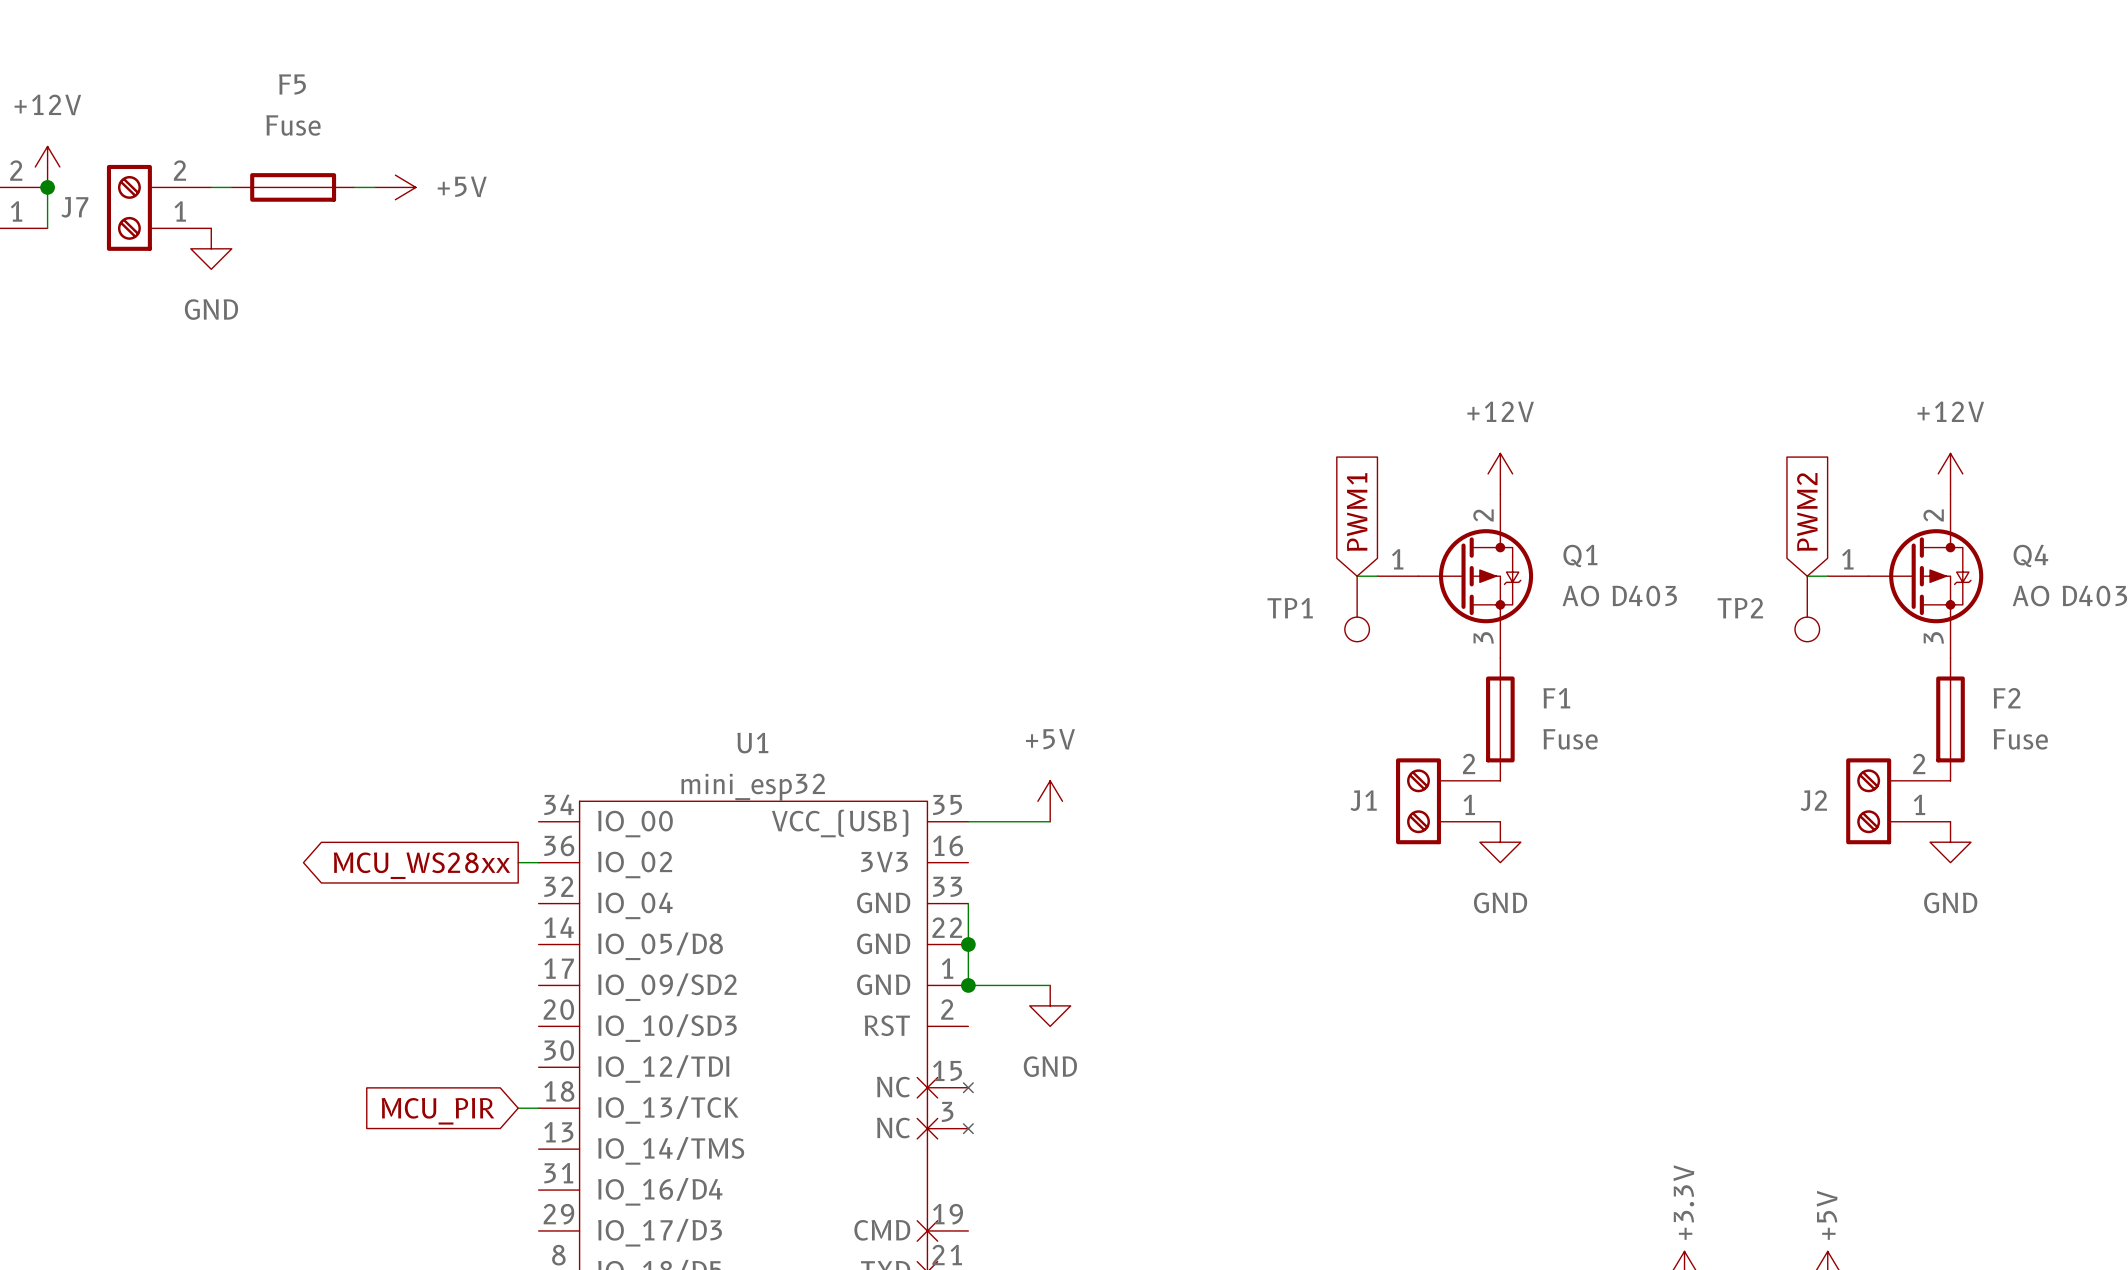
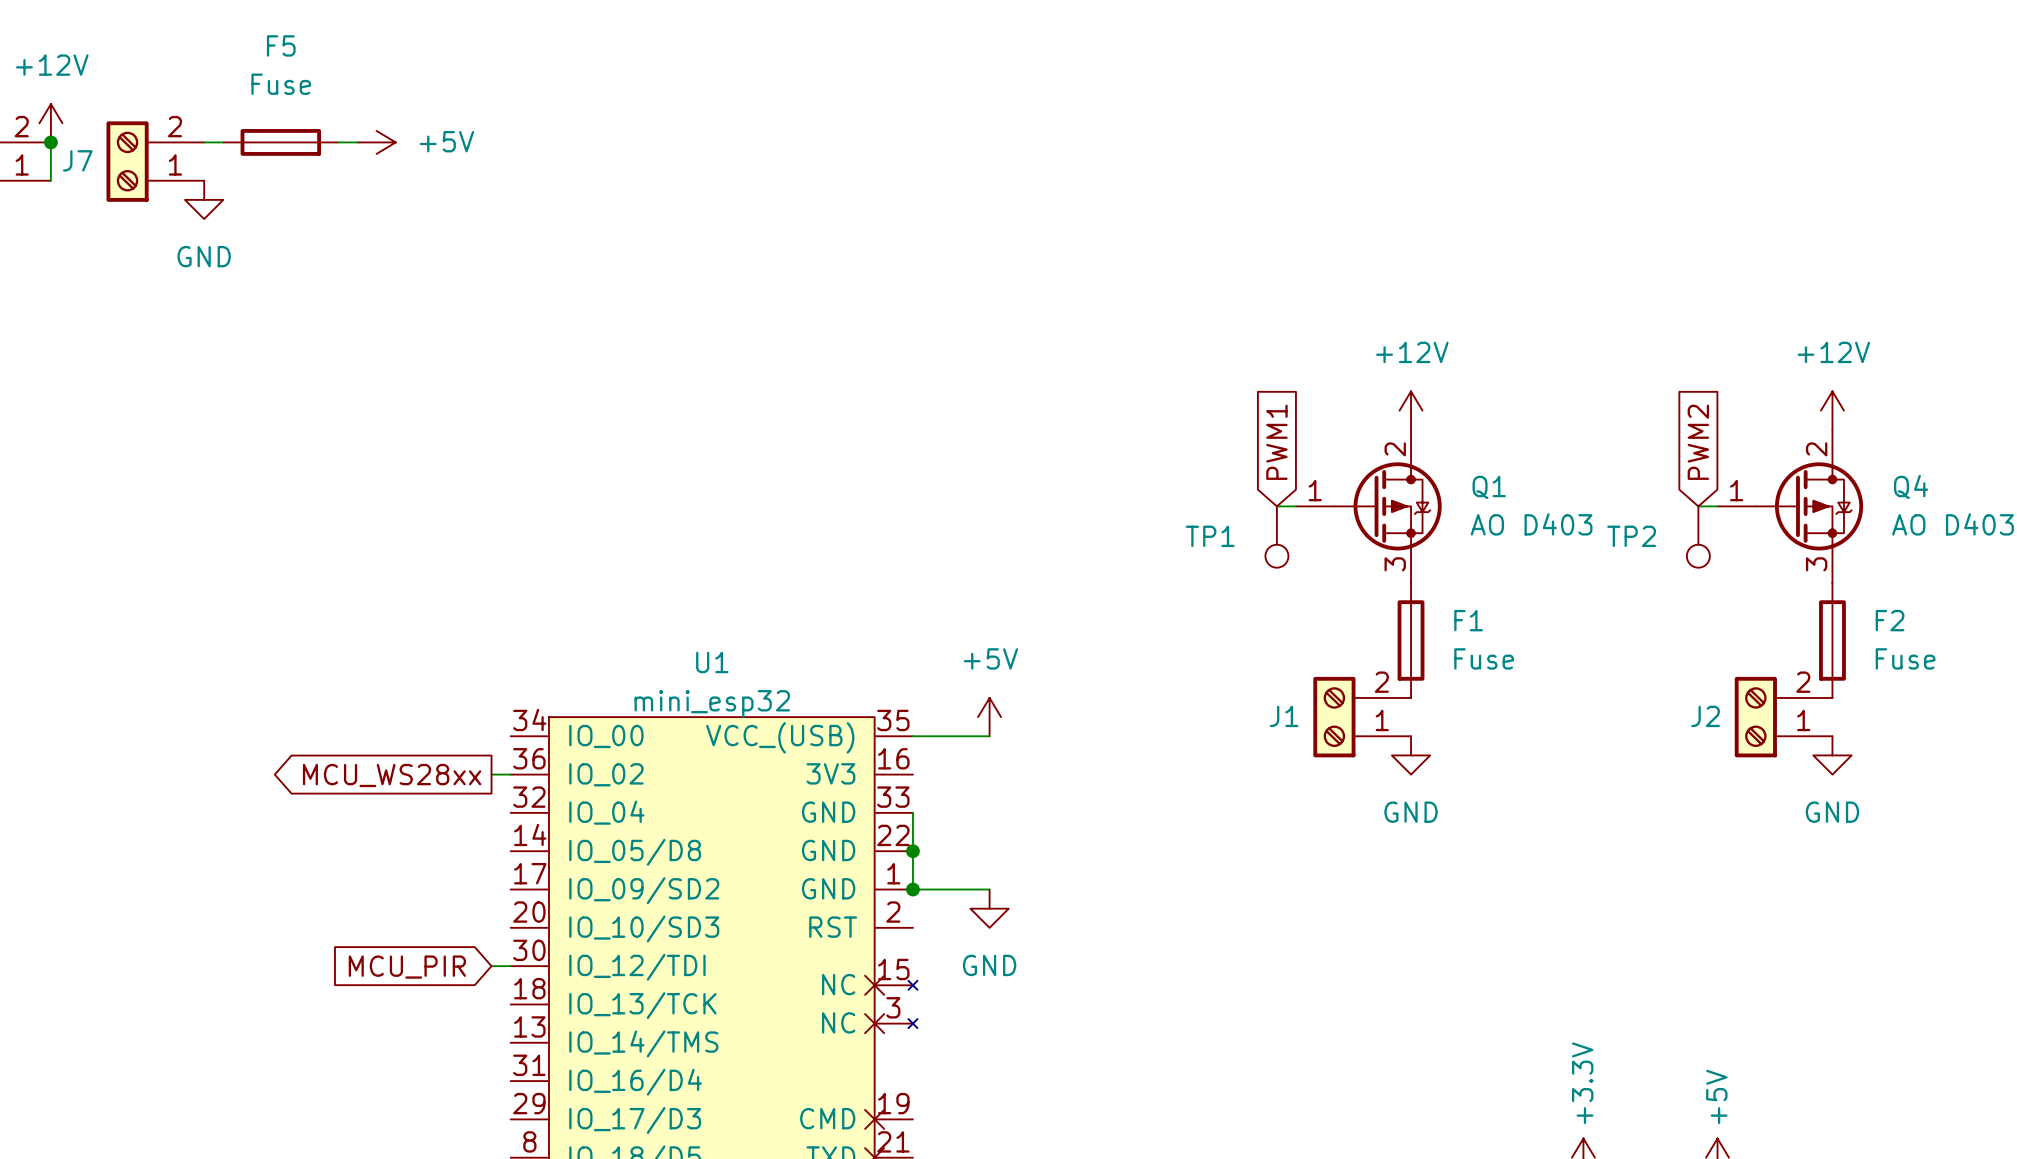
wire: (518, 1108) (538, 1108) -> (491, 966) (510, 966)
global label position: MCU_PIR (438, 1111) -> MCU_PIR (407, 967)

